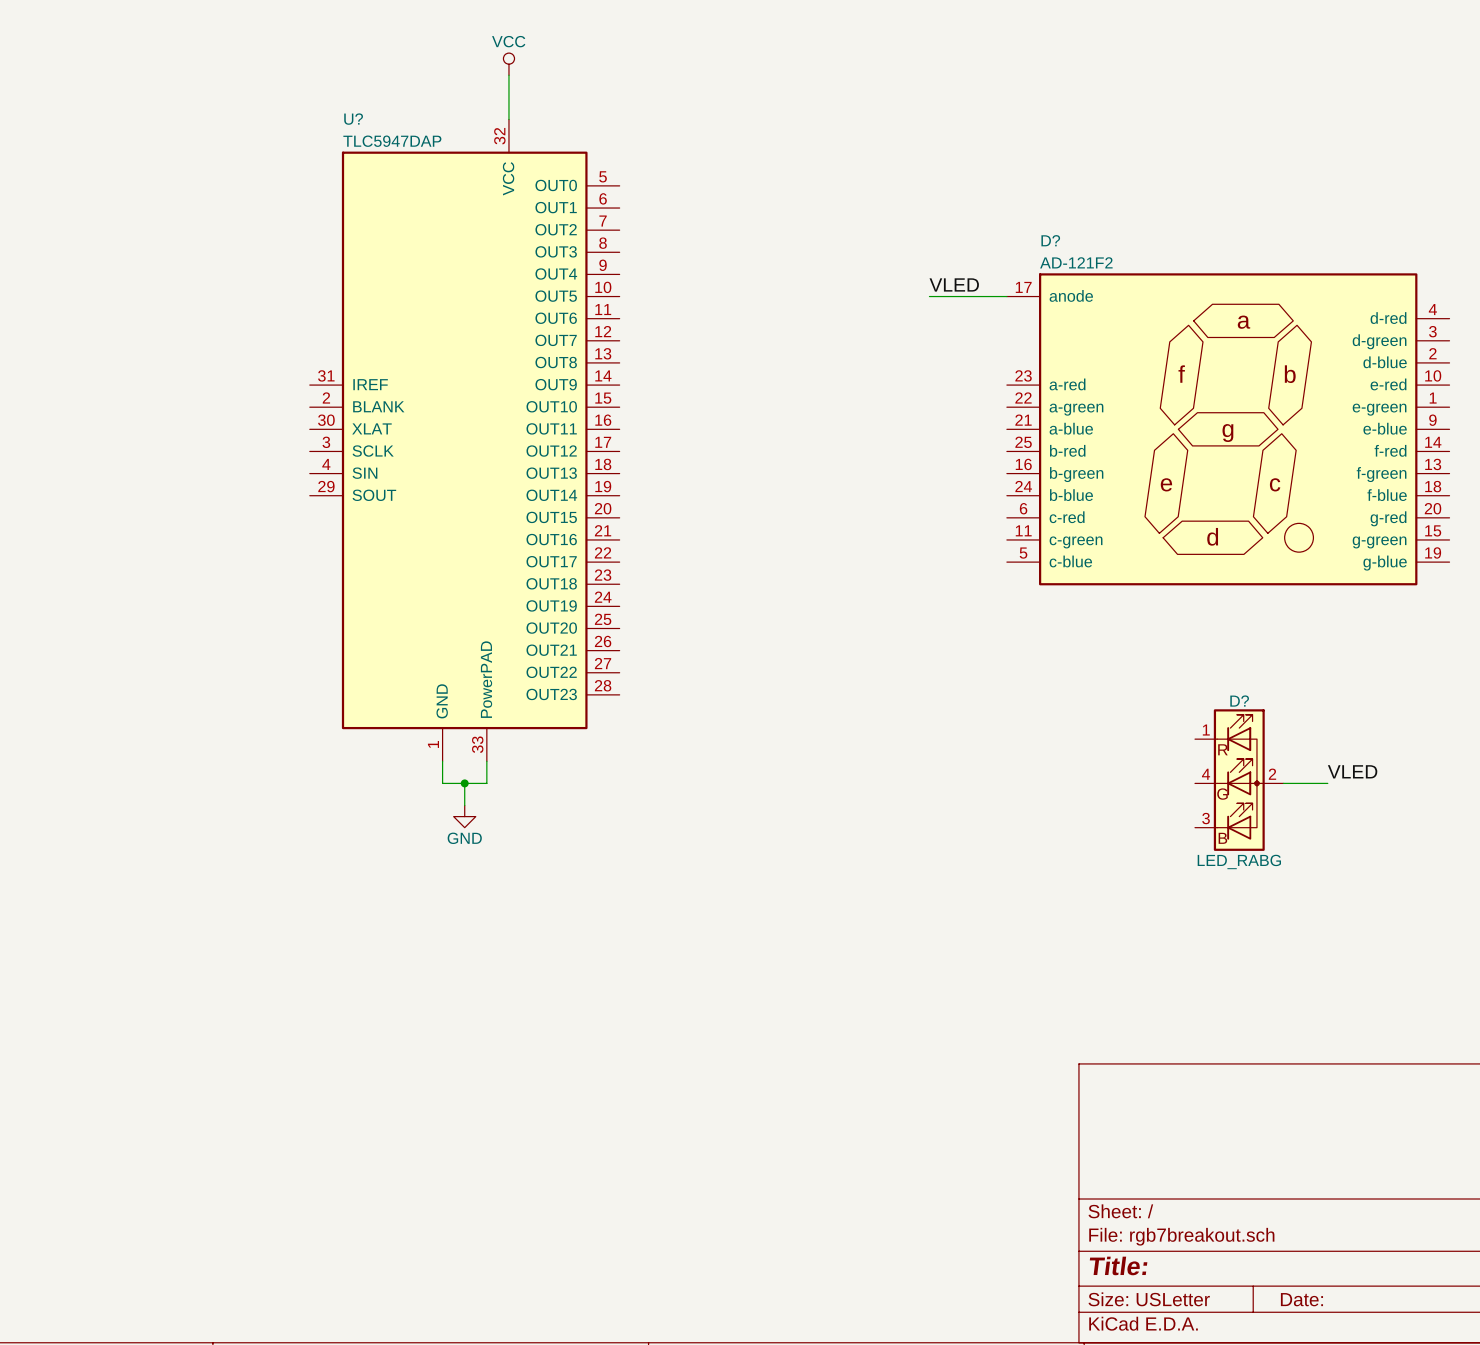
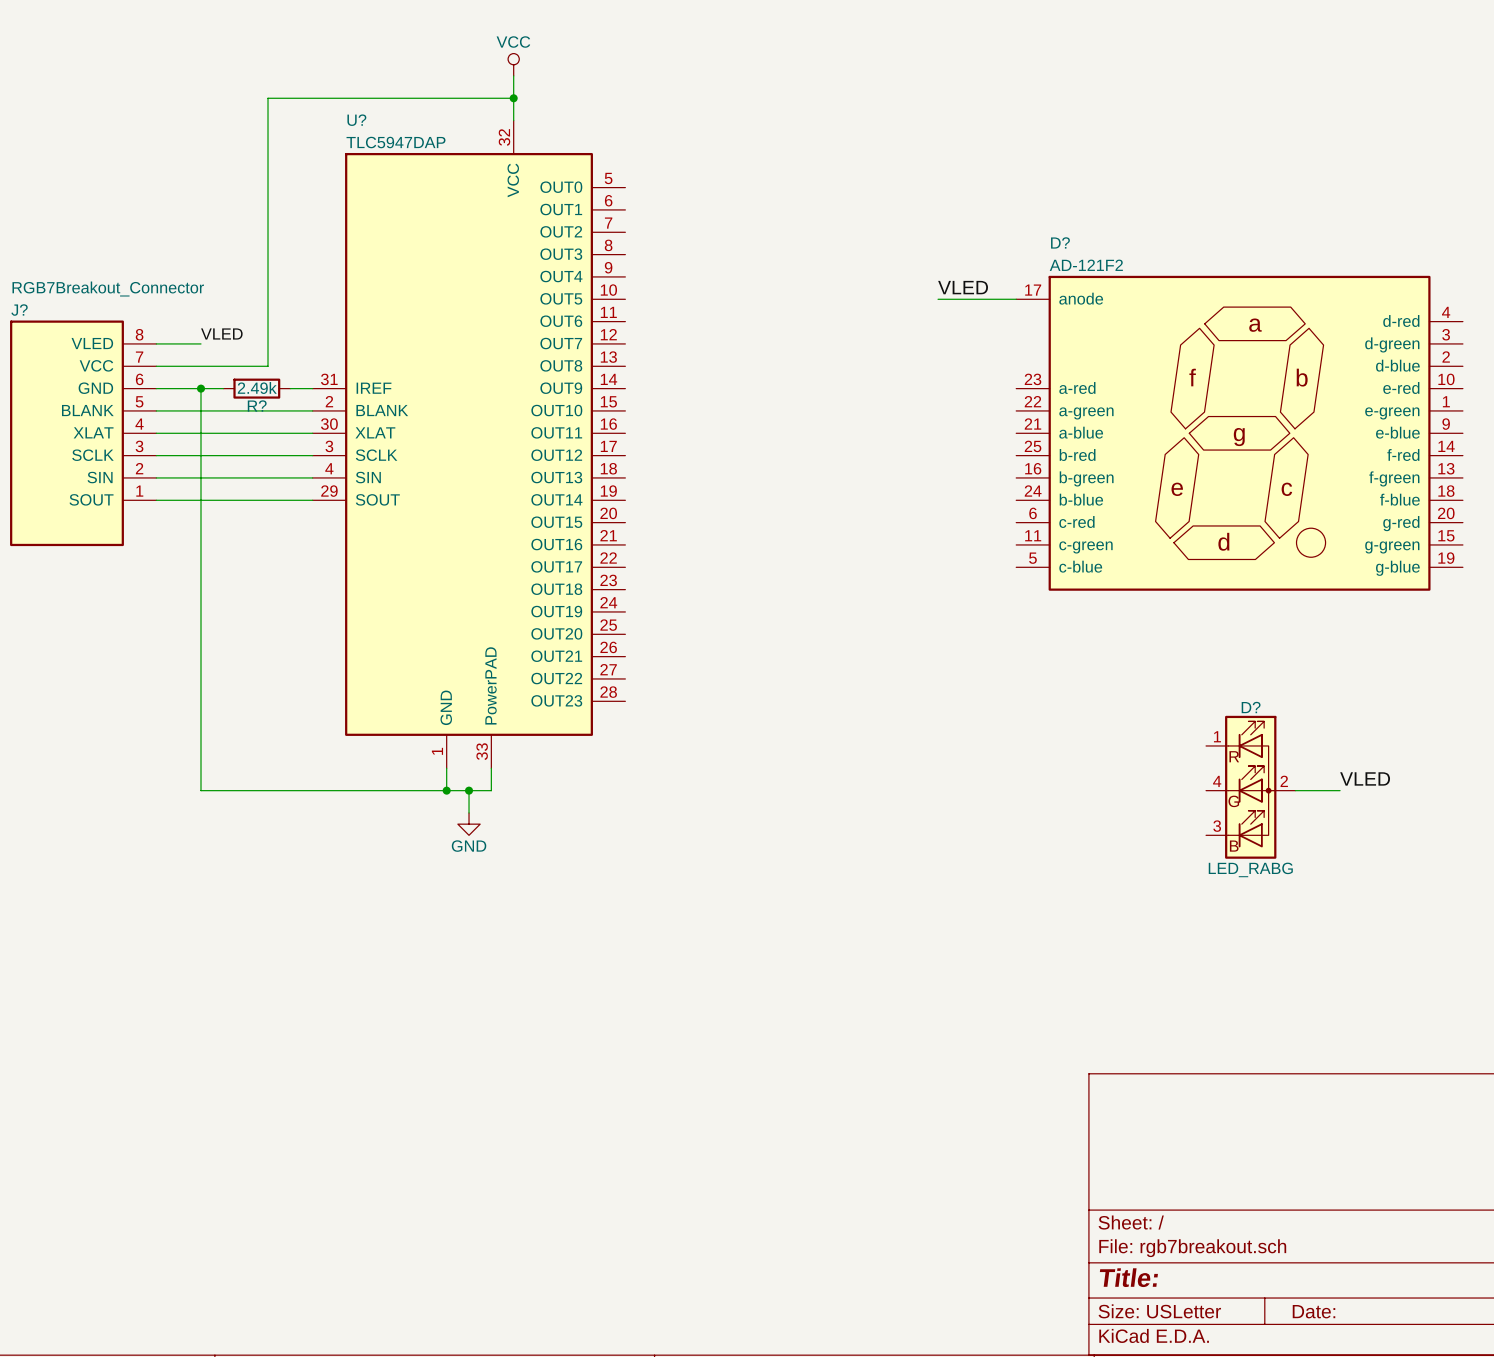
wire: none -> (513, 98) (268, 98) (268, 366) (156, 366)
junction: none -> (513, 98)
label: none -> VLED (221, 333)
wire: none -> (156, 343) (201, 343)
wire: none -> (156, 388) (223, 388)
wire: none -> (201, 388) (201, 790) (446, 790)
junction: none -> (201, 388)
R?: none -> 2.49k (256, 388)
wire: none -> (290, 388) (312, 388)
wire: none -> (156, 410) (312, 410)
J?: none -> RGB7Breakout_Connector (83, 433)
wire: none -> (156, 433) (312, 433)
wire: none -> (156, 455) (312, 455)
wire: none -> (156, 477) (312, 477)
wire: none -> (156, 500) (312, 500)
junction: none -> (446, 790)

